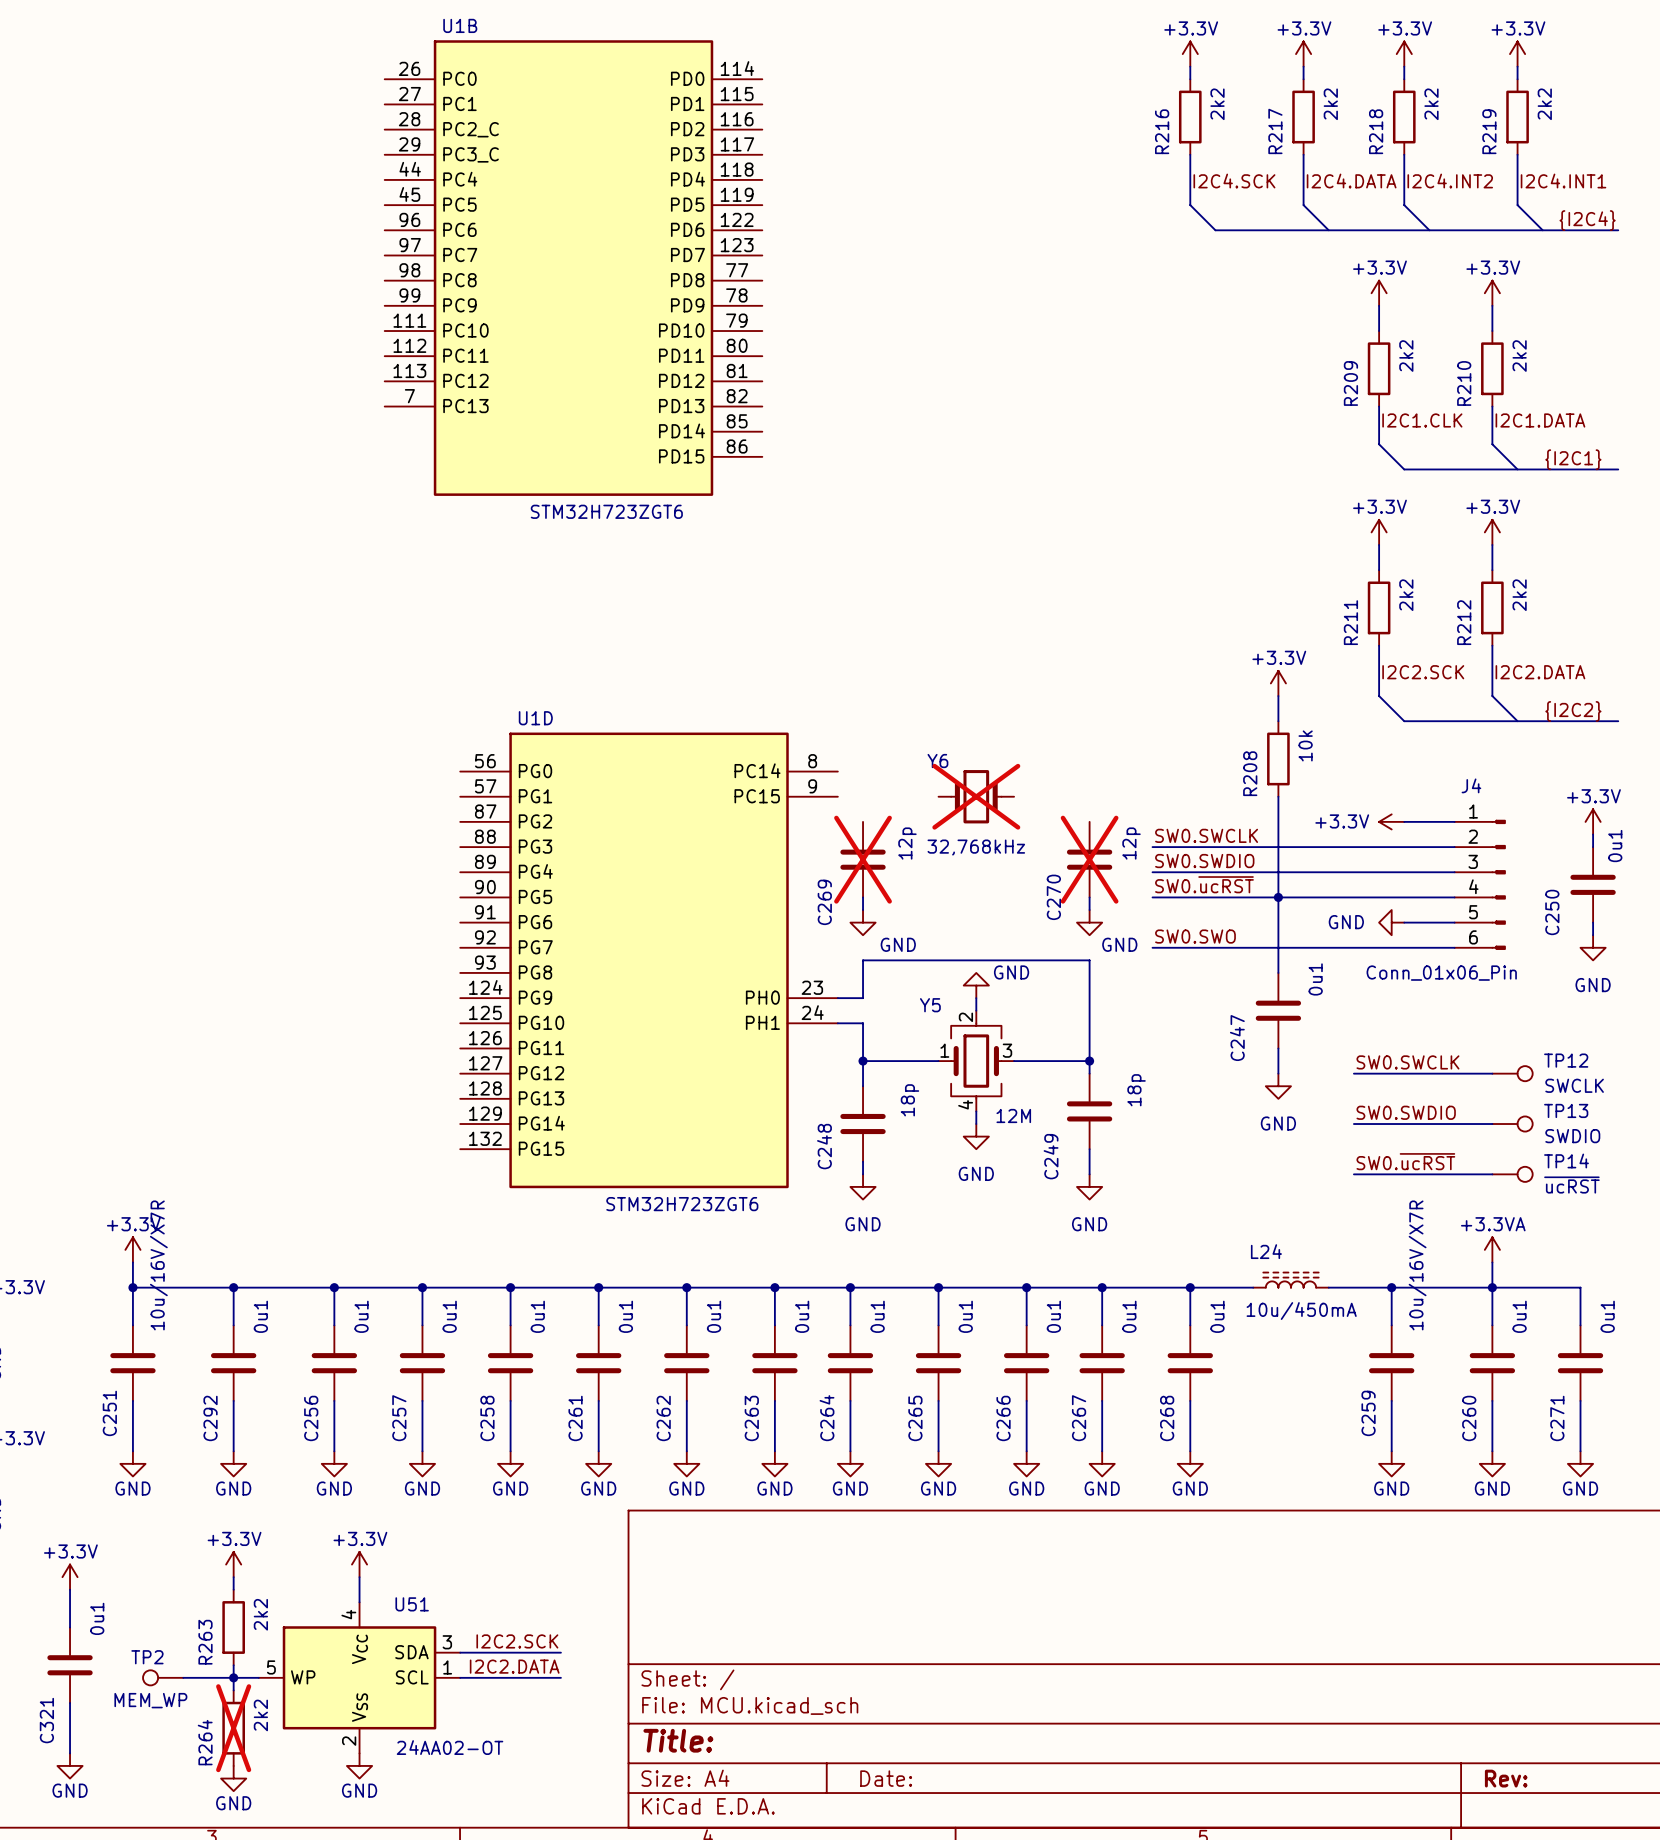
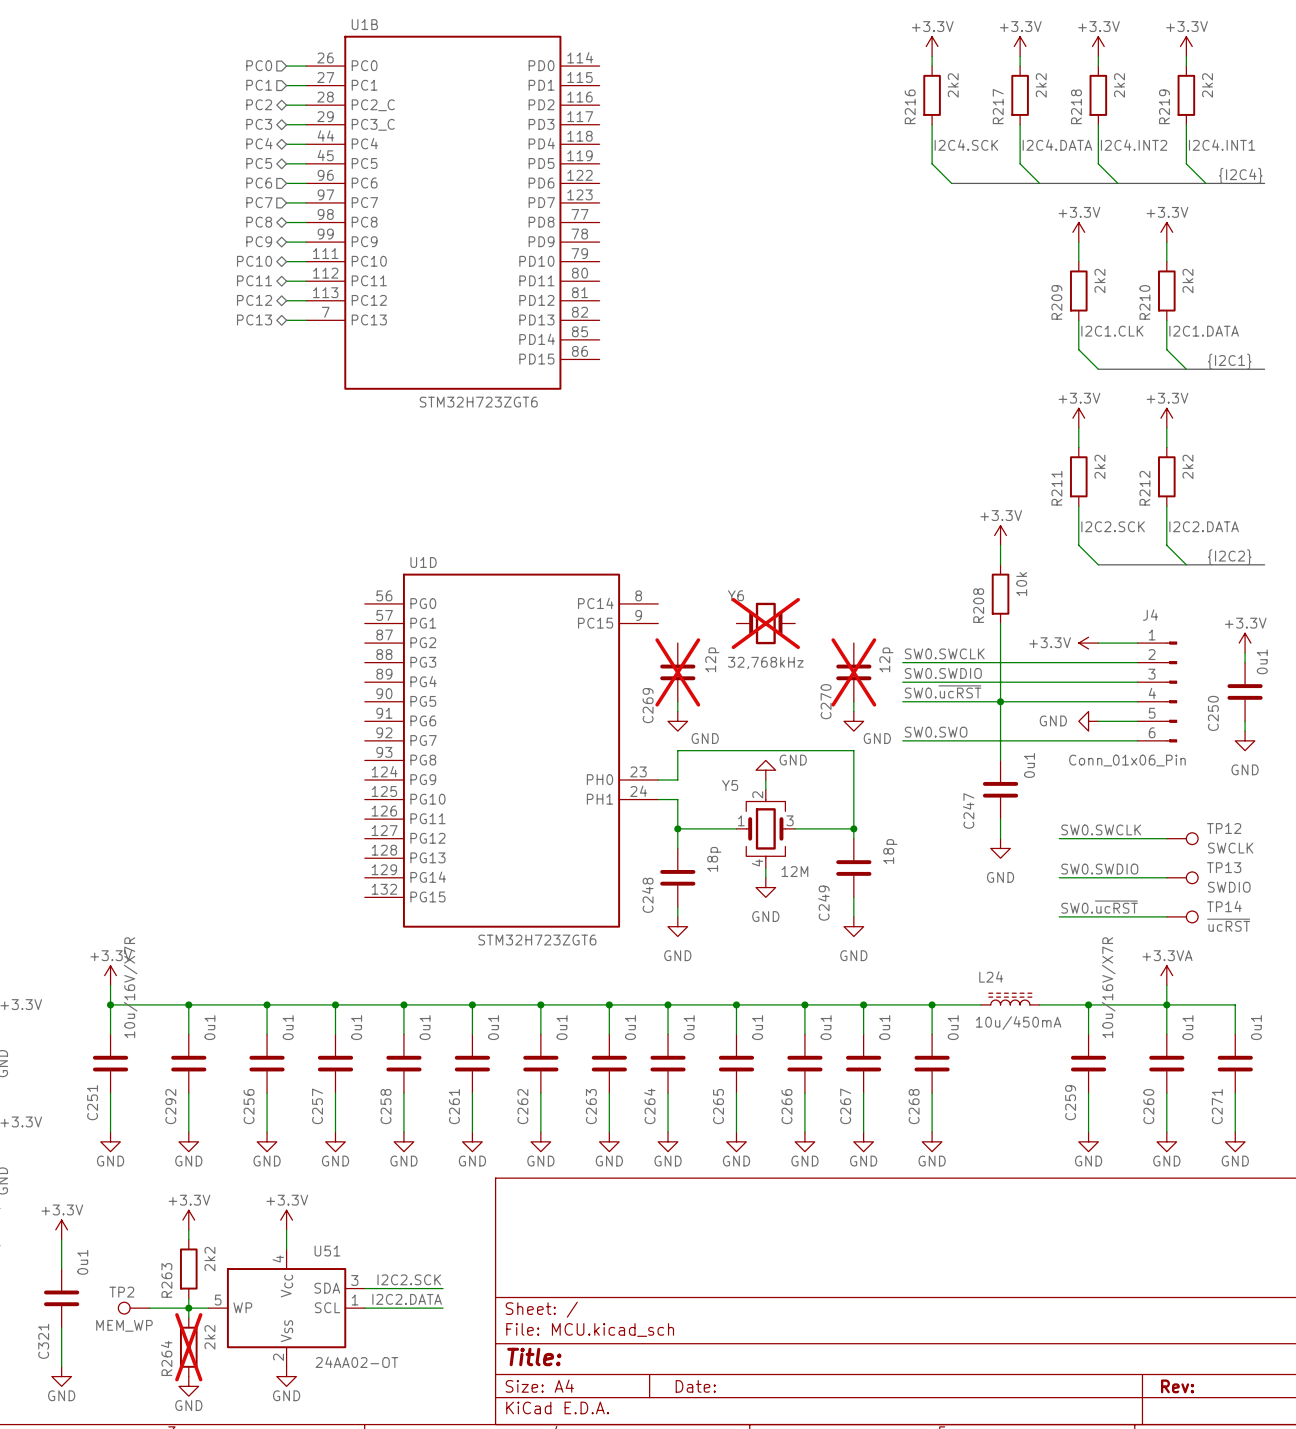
hierarchical label: none -> PC0 (259, 65)
wire: none -> (286, 66) (306, 66)
hierarchical label: none -> PC1 (259, 85)
wire: none -> (286, 85) (306, 85)
hierarchical label: none -> PC2 (259, 104)
wire: none -> (286, 105) (306, 105)
hierarchical label: none -> PC3 (259, 124)
wire: none -> (286, 124) (306, 124)
hierarchical label: none -> PC4 (259, 143)
wire: none -> (286, 144) (306, 144)
hierarchical label: none -> PC5 (259, 163)
wire: none -> (286, 163) (306, 163)
hierarchical label: none -> PC6 (259, 183)
wire: none -> (286, 183) (306, 183)
hierarchical label: none -> PC7 (259, 202)
wire: none -> (286, 202) (306, 202)
hierarchical label: none -> PC8 (259, 222)
wire: none -> (286, 222) (306, 222)
hierarchical label: none -> PC9 (259, 241)
wire: none -> (286, 242) (306, 242)
hierarchical label: none -> PC10 (254, 261)
wire: none -> (286, 261) (306, 261)
hierarchical label: none -> PC11 (254, 280)
wire: none -> (286, 281) (306, 281)
hierarchical label: none -> PC12 (254, 300)
wire: none -> (286, 300) (306, 300)
hierarchical label: none -> PC13 (254, 319)
wire: none -> (286, 320) (306, 320)

